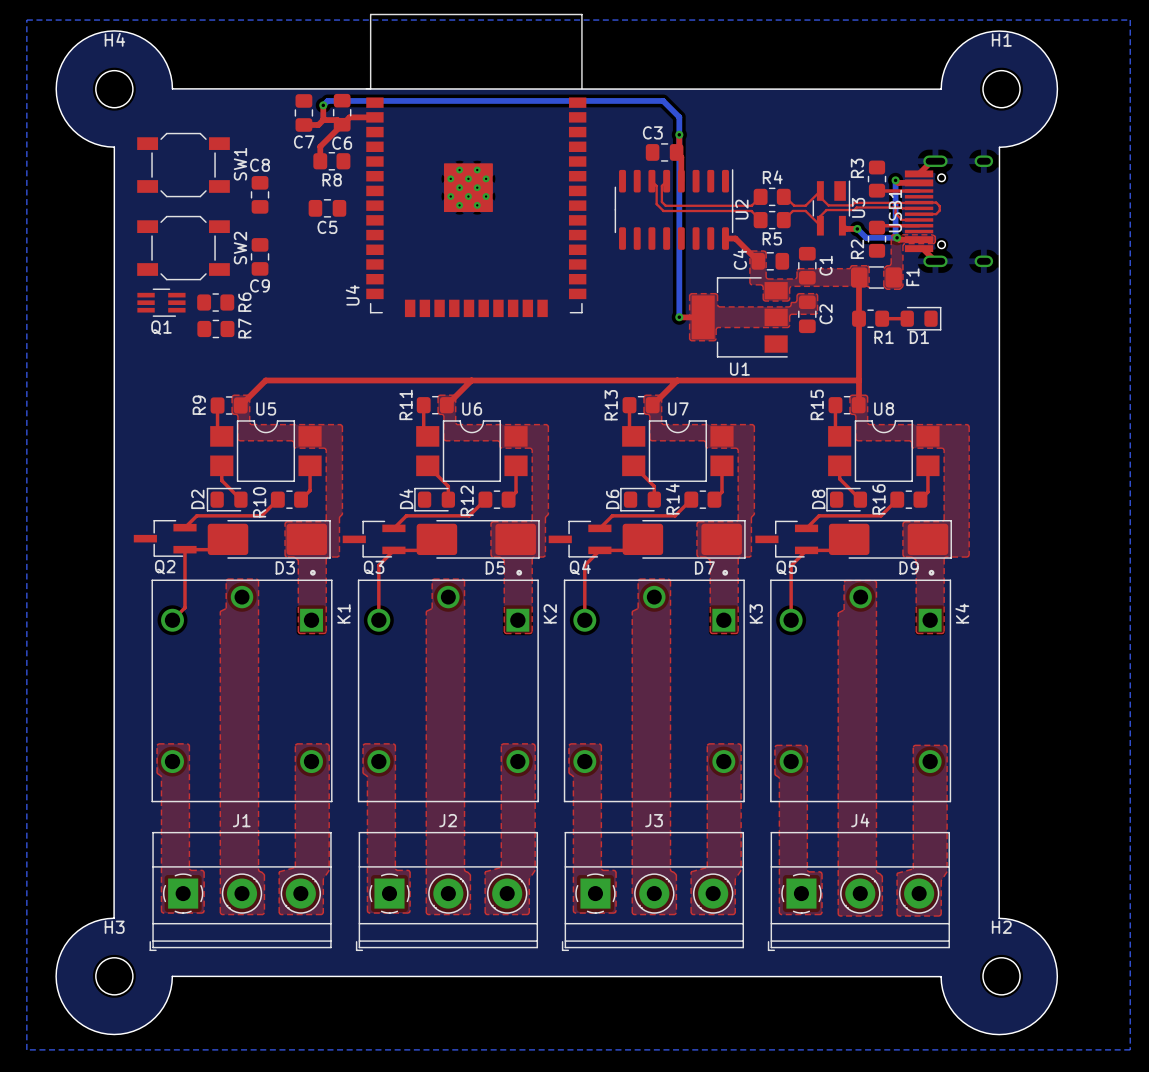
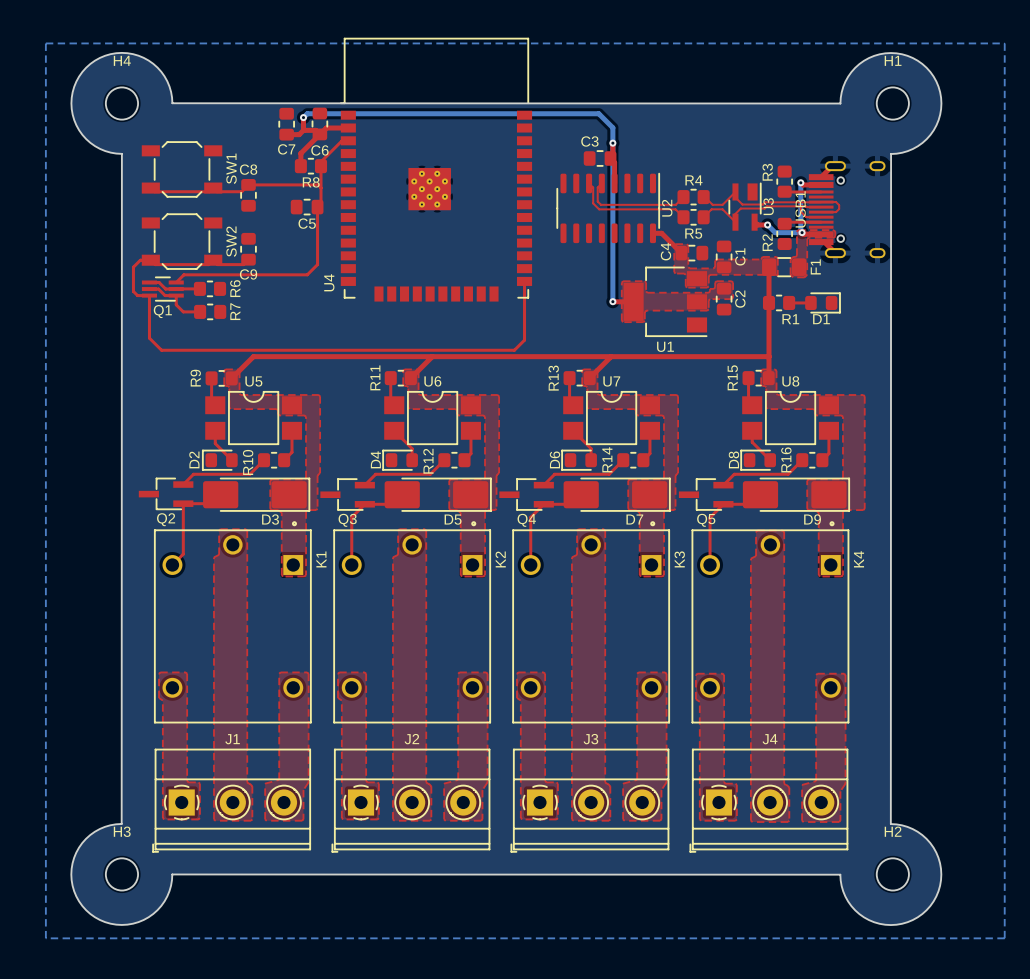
top track: none -> (348, 140) (342, 140) (321, 161) (321, 203) (317, 207) (317, 264) (307, 274) (183, 274) (176, 282)
top track: none -> (321, 187) (318, 184) (248, 184) (241, 191) (216, 191) (213, 188) (209, 191) (154, 191) (150, 188)
top track: none -> (248, 259) (243, 264) (217, 264) (213, 260) (208, 264) (155, 264) (150, 260) (140, 260) (133, 267) (133, 291) (137, 295) (149, 295) (149, 338) (161, 350) (514, 350) (524, 340) (524, 281)
top track: none -> (149, 282) (159, 282) (165, 289) (199, 288)
top track: none -> (149, 289) (158, 289) (165, 295) (176, 295) (176, 304) (183, 311) (200, 311)

